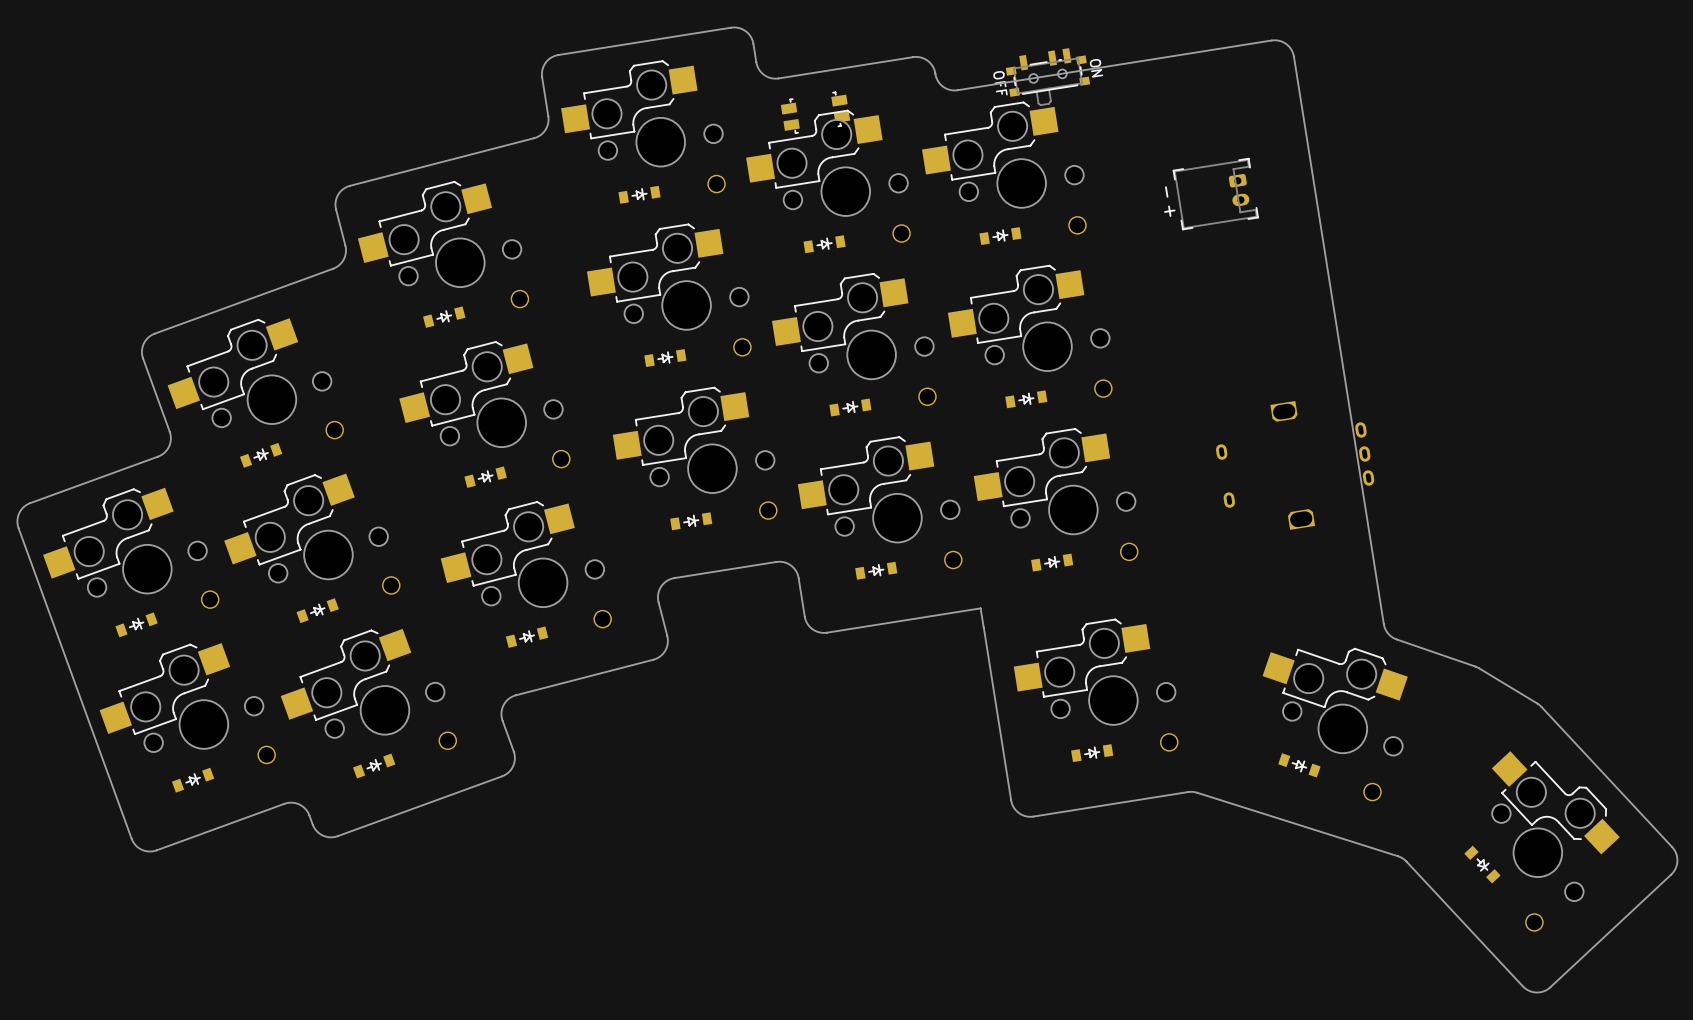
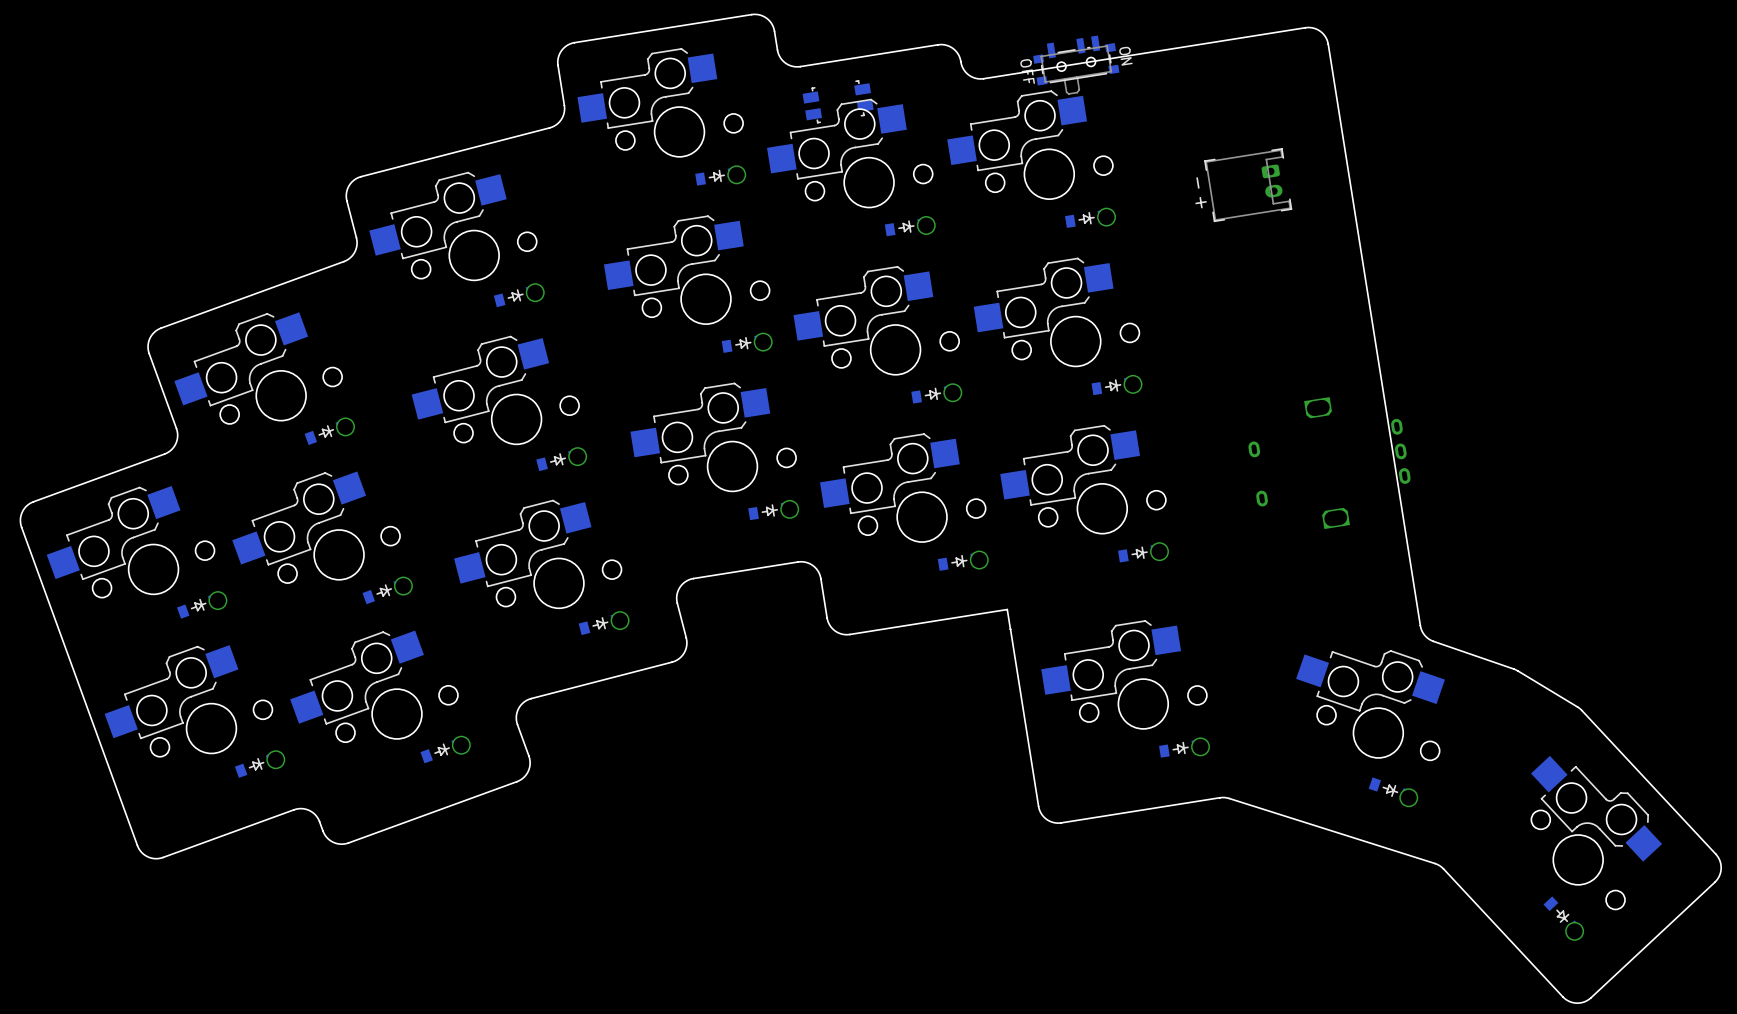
part position: (639, 194) -> (716, 176)
part position: (1000, 236) -> (1086, 218)
part position: (824, 244) -> (906, 227)
part position: (444, 317) -> (515, 296)
part position: (665, 358) -> (743, 343)
part position: (1026, 399) -> (1113, 386)
part position: (850, 407) -> (932, 394)
part position: (261, 455) -> (326, 432)
part position: (485, 477) -> (557, 460)
part position: (691, 521) -> (769, 511)
part position: (1052, 562) -> (1139, 553)
part position: (876, 570) -> (959, 561)
part position: (317, 610) -> (384, 591)
part position: (136, 624) -> (198, 606)
part position: (527, 637) -> (600, 624)
part position: (1092, 753) -> (1180, 748)
part position: (1299, 765) -> (1390, 789)
part position: (374, 766) -> (442, 750)
part position: (193, 780) -> (256, 765)
part position: (1482, 864) -> (1562, 915)

